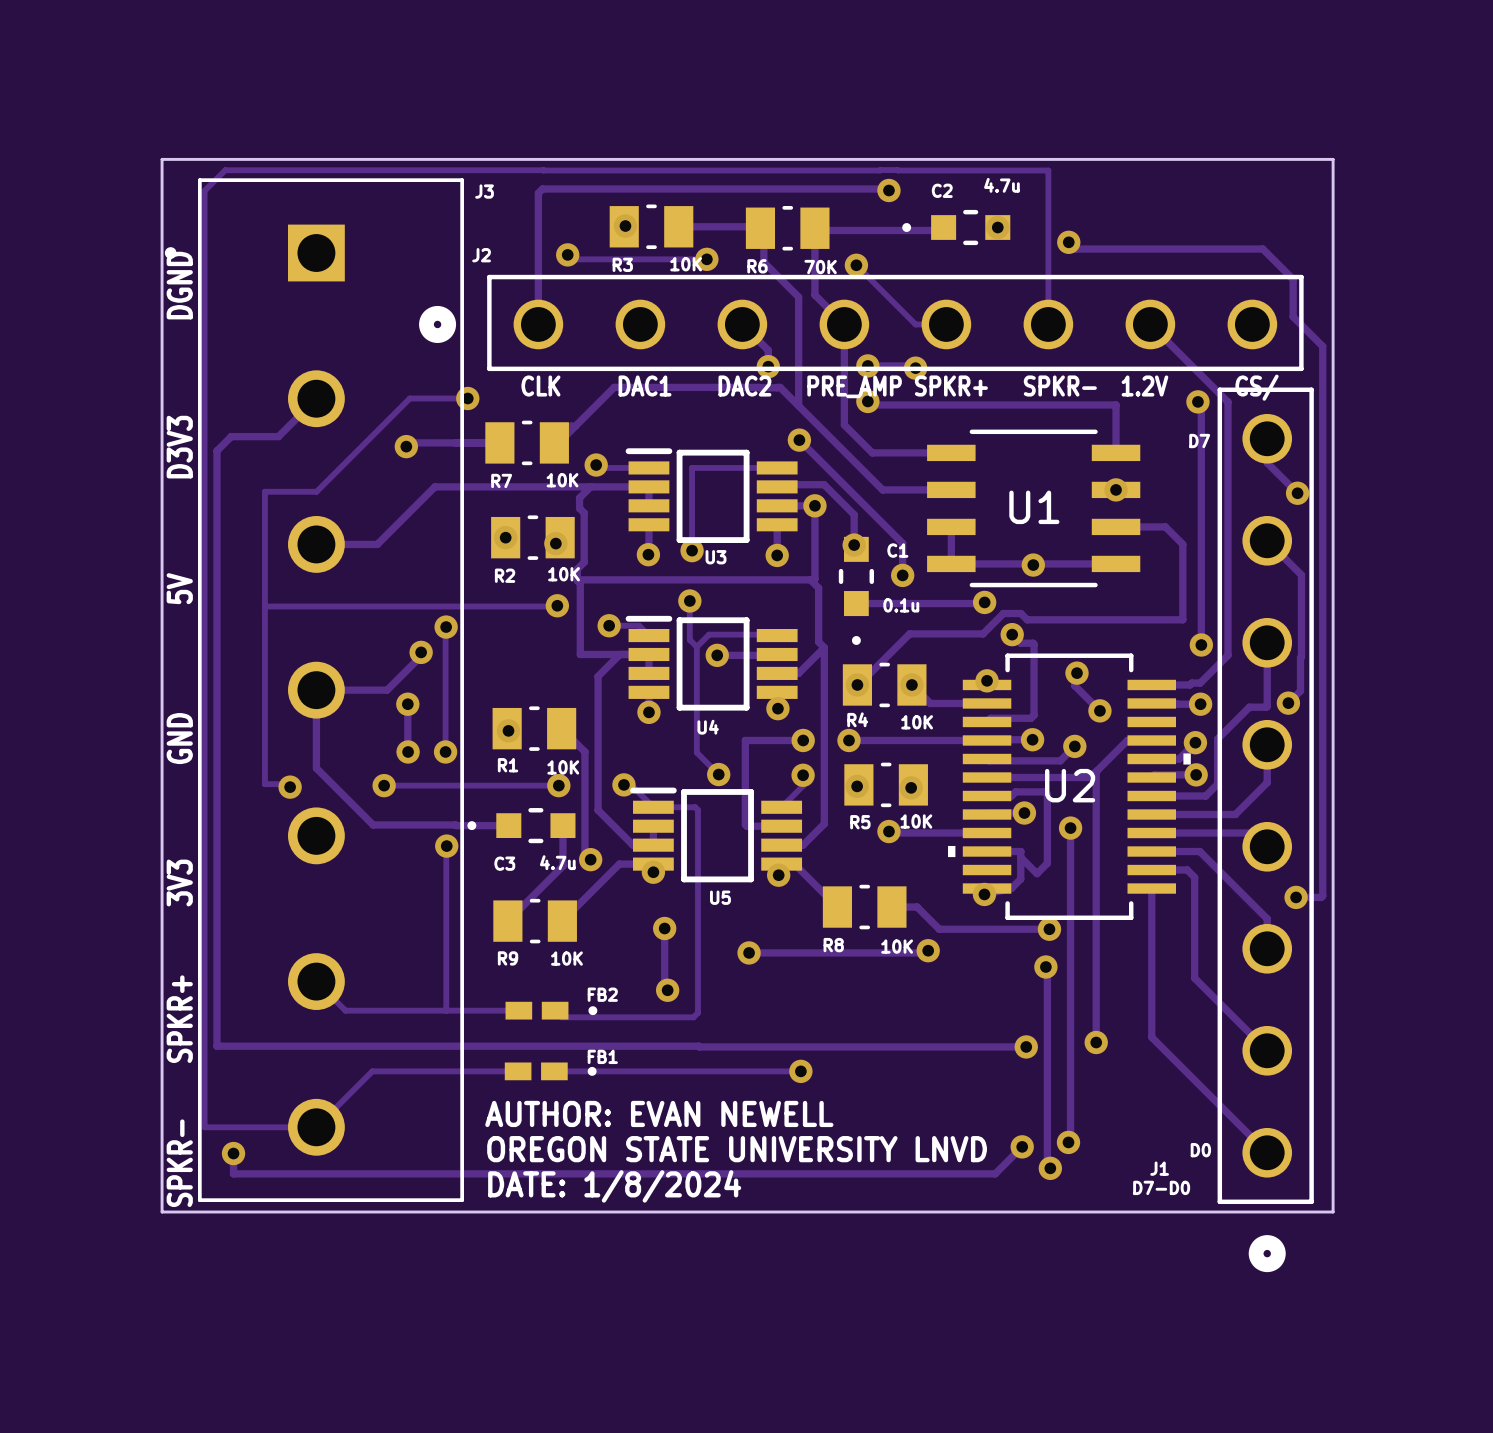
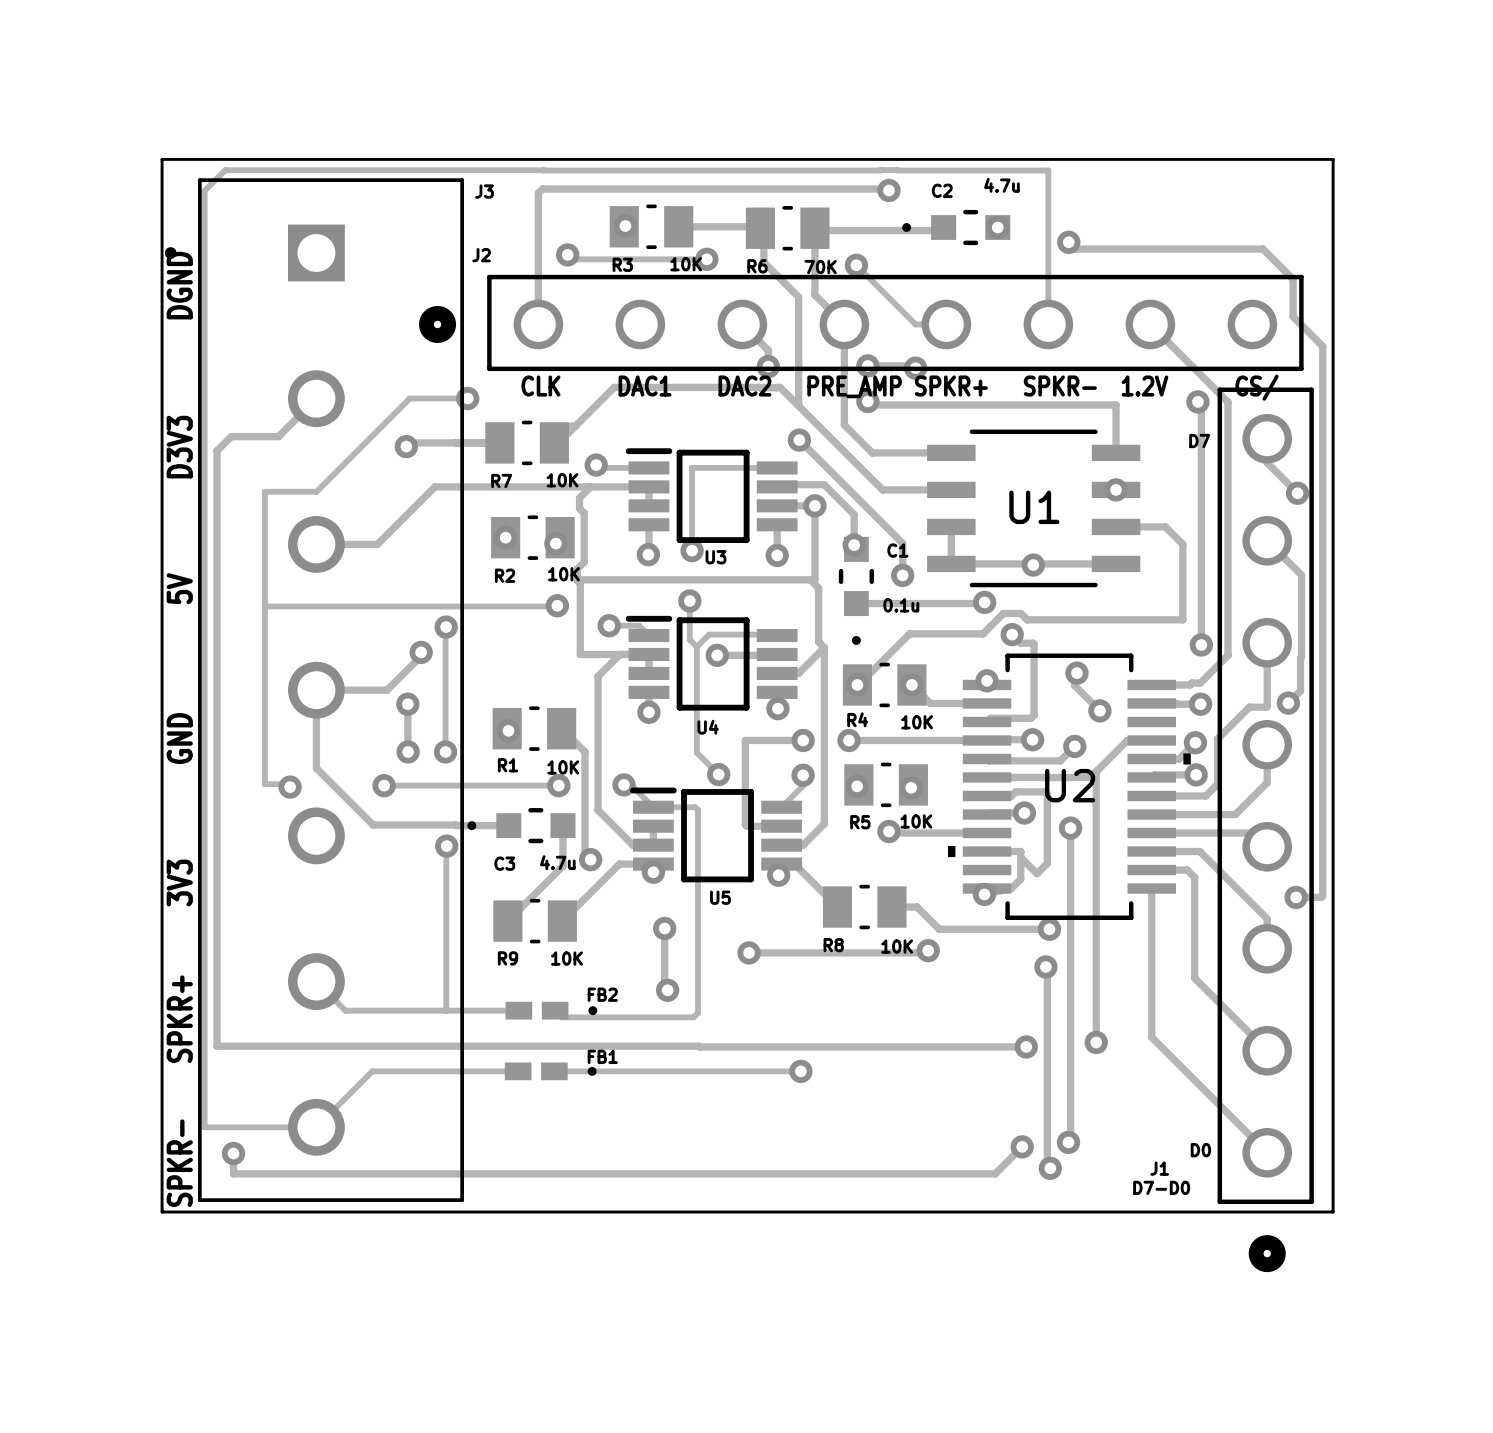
text: AUTHOR: EVAN NEWELL (659, 1113) -> none
text: OREGON STATE UNIVERSITY LNVD (737, 1149) -> none
text: DATE: 1/8/2024 (614, 1186) -> none

